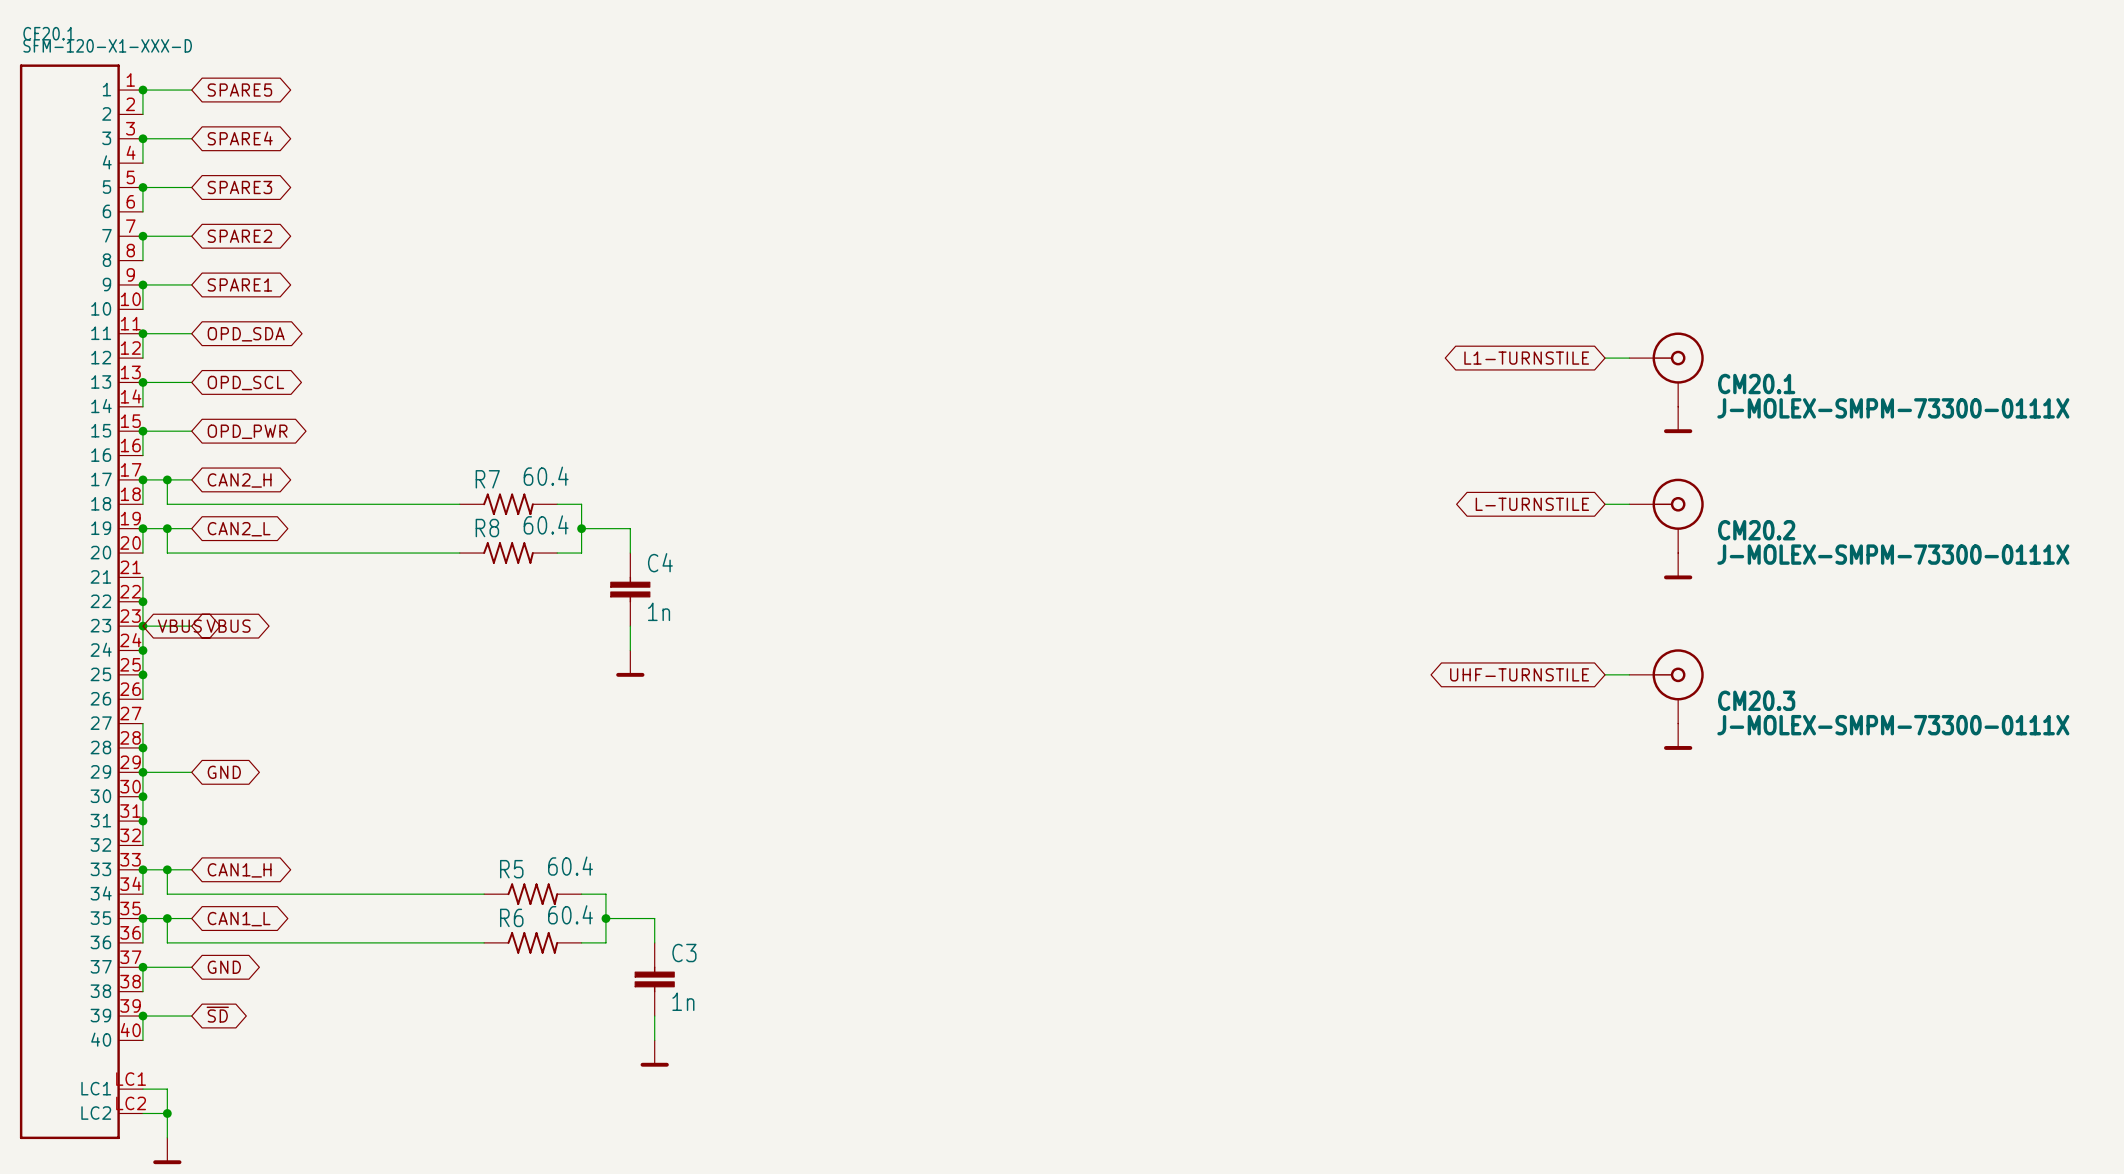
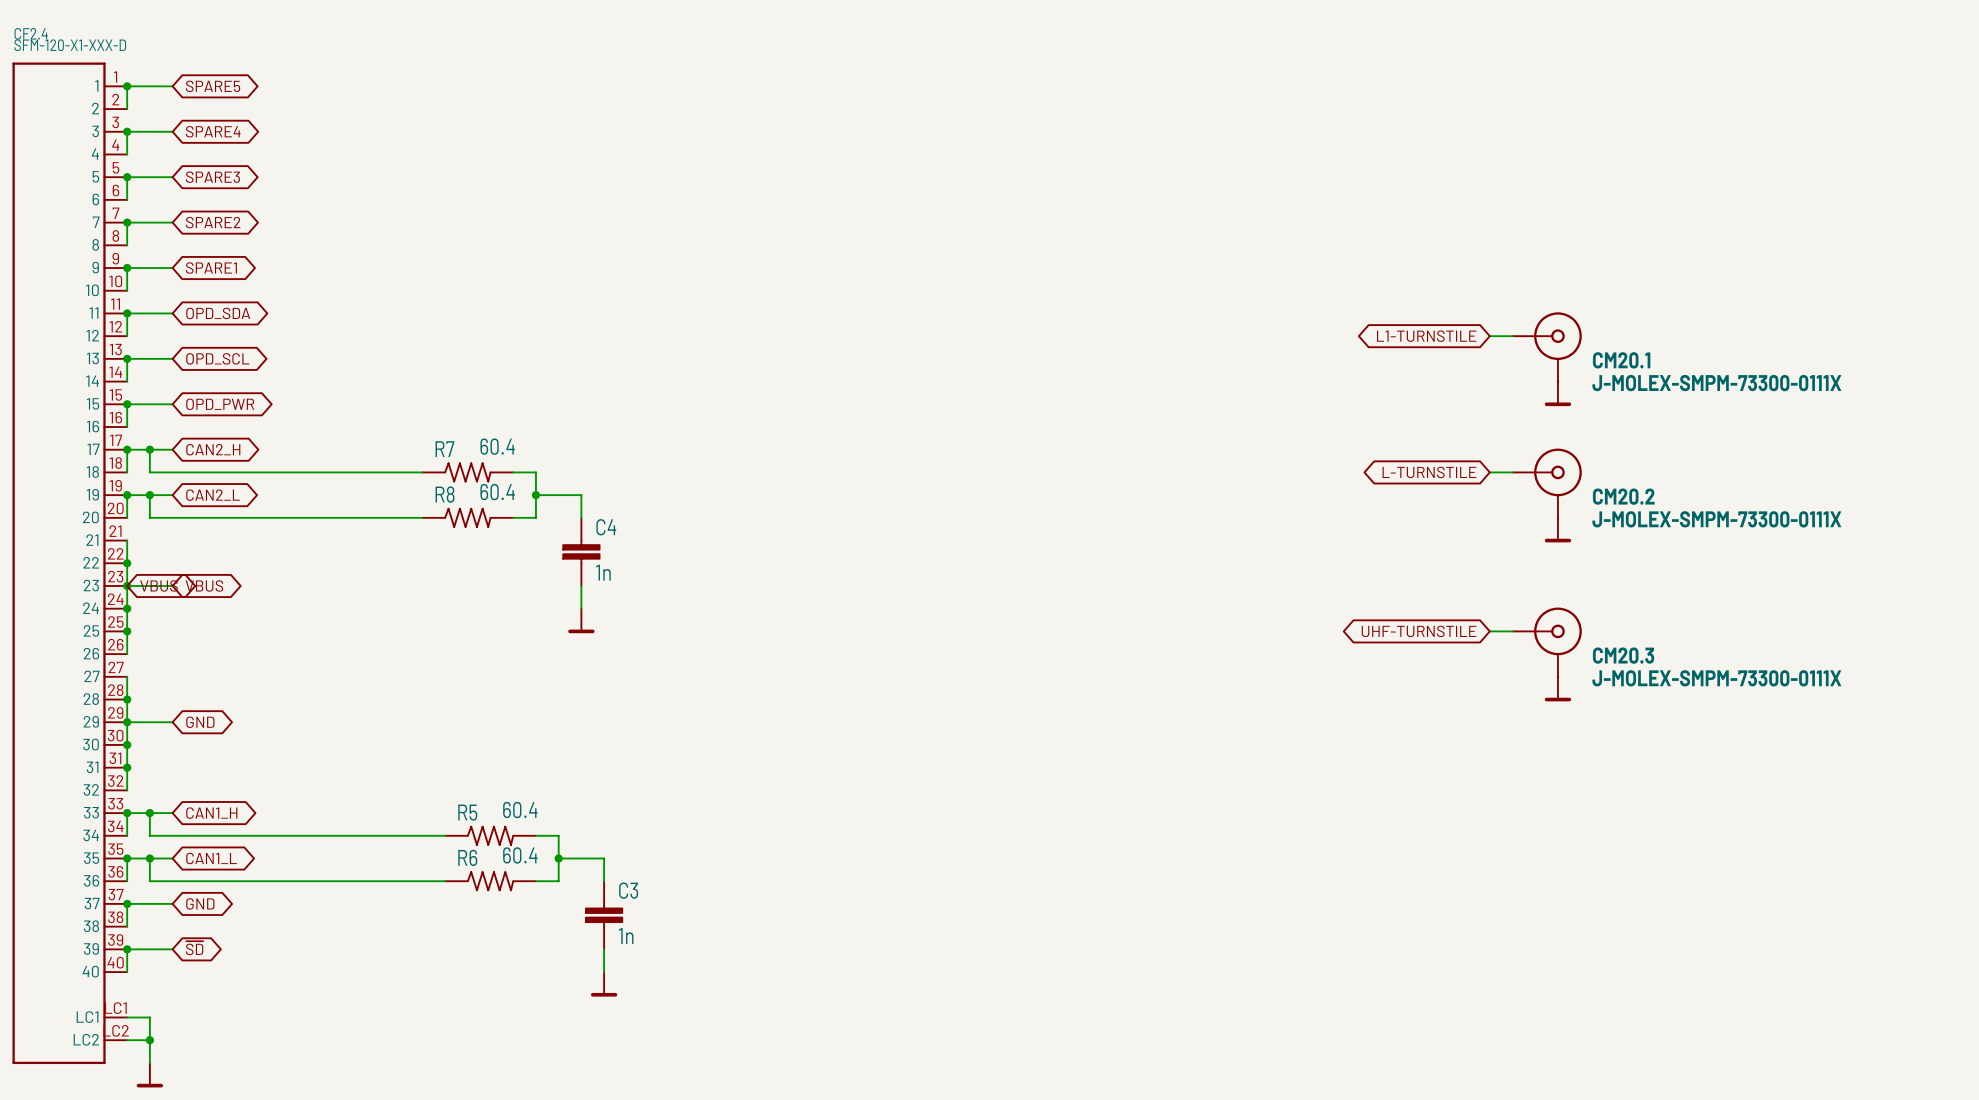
CF20.1 name: CF20.1 (48, 33) -> CF2.4 (31, 33)

